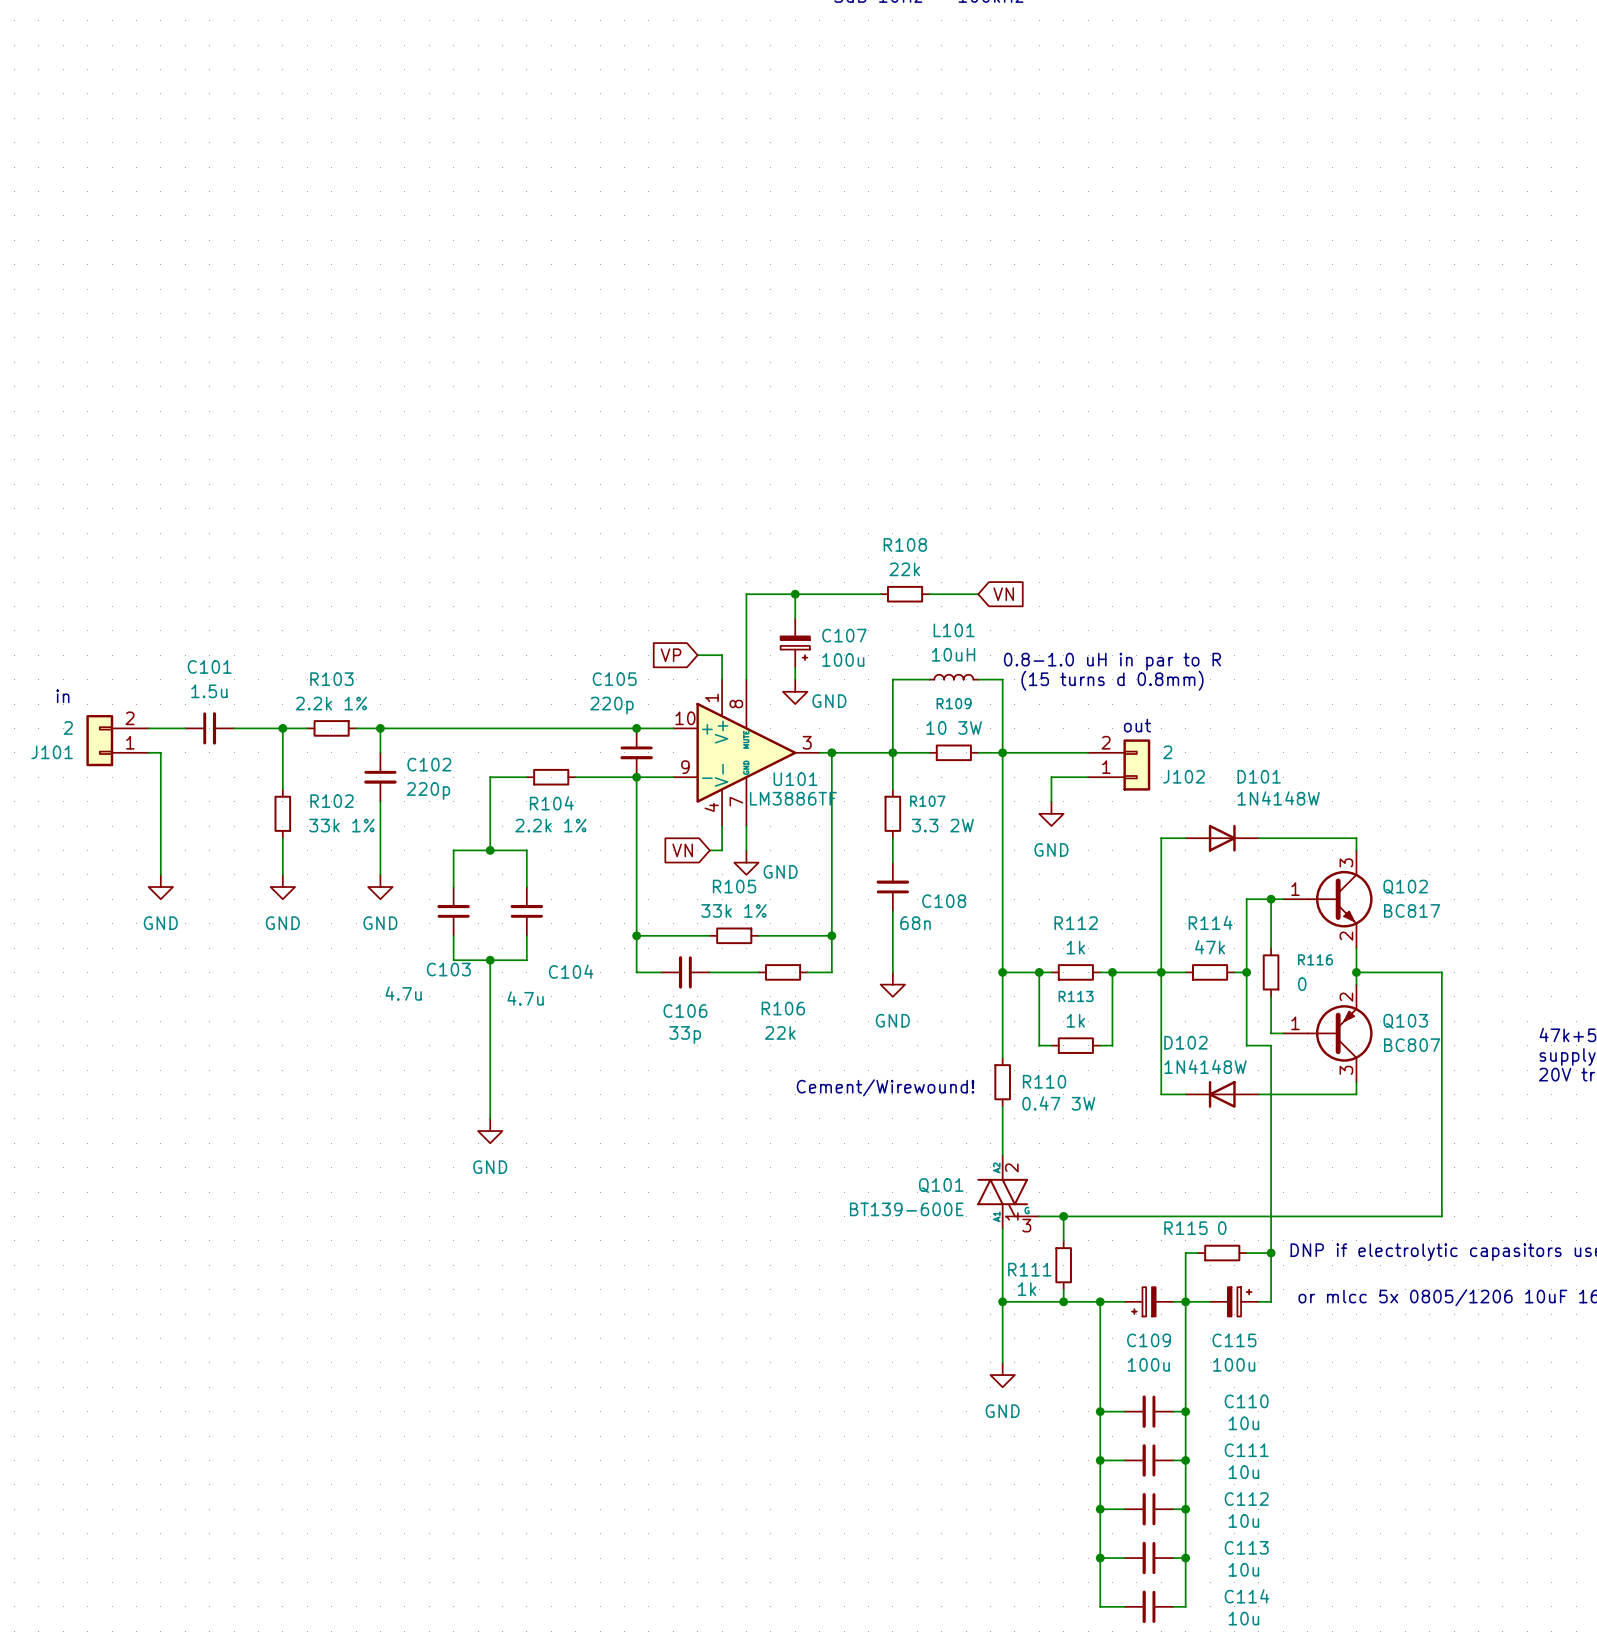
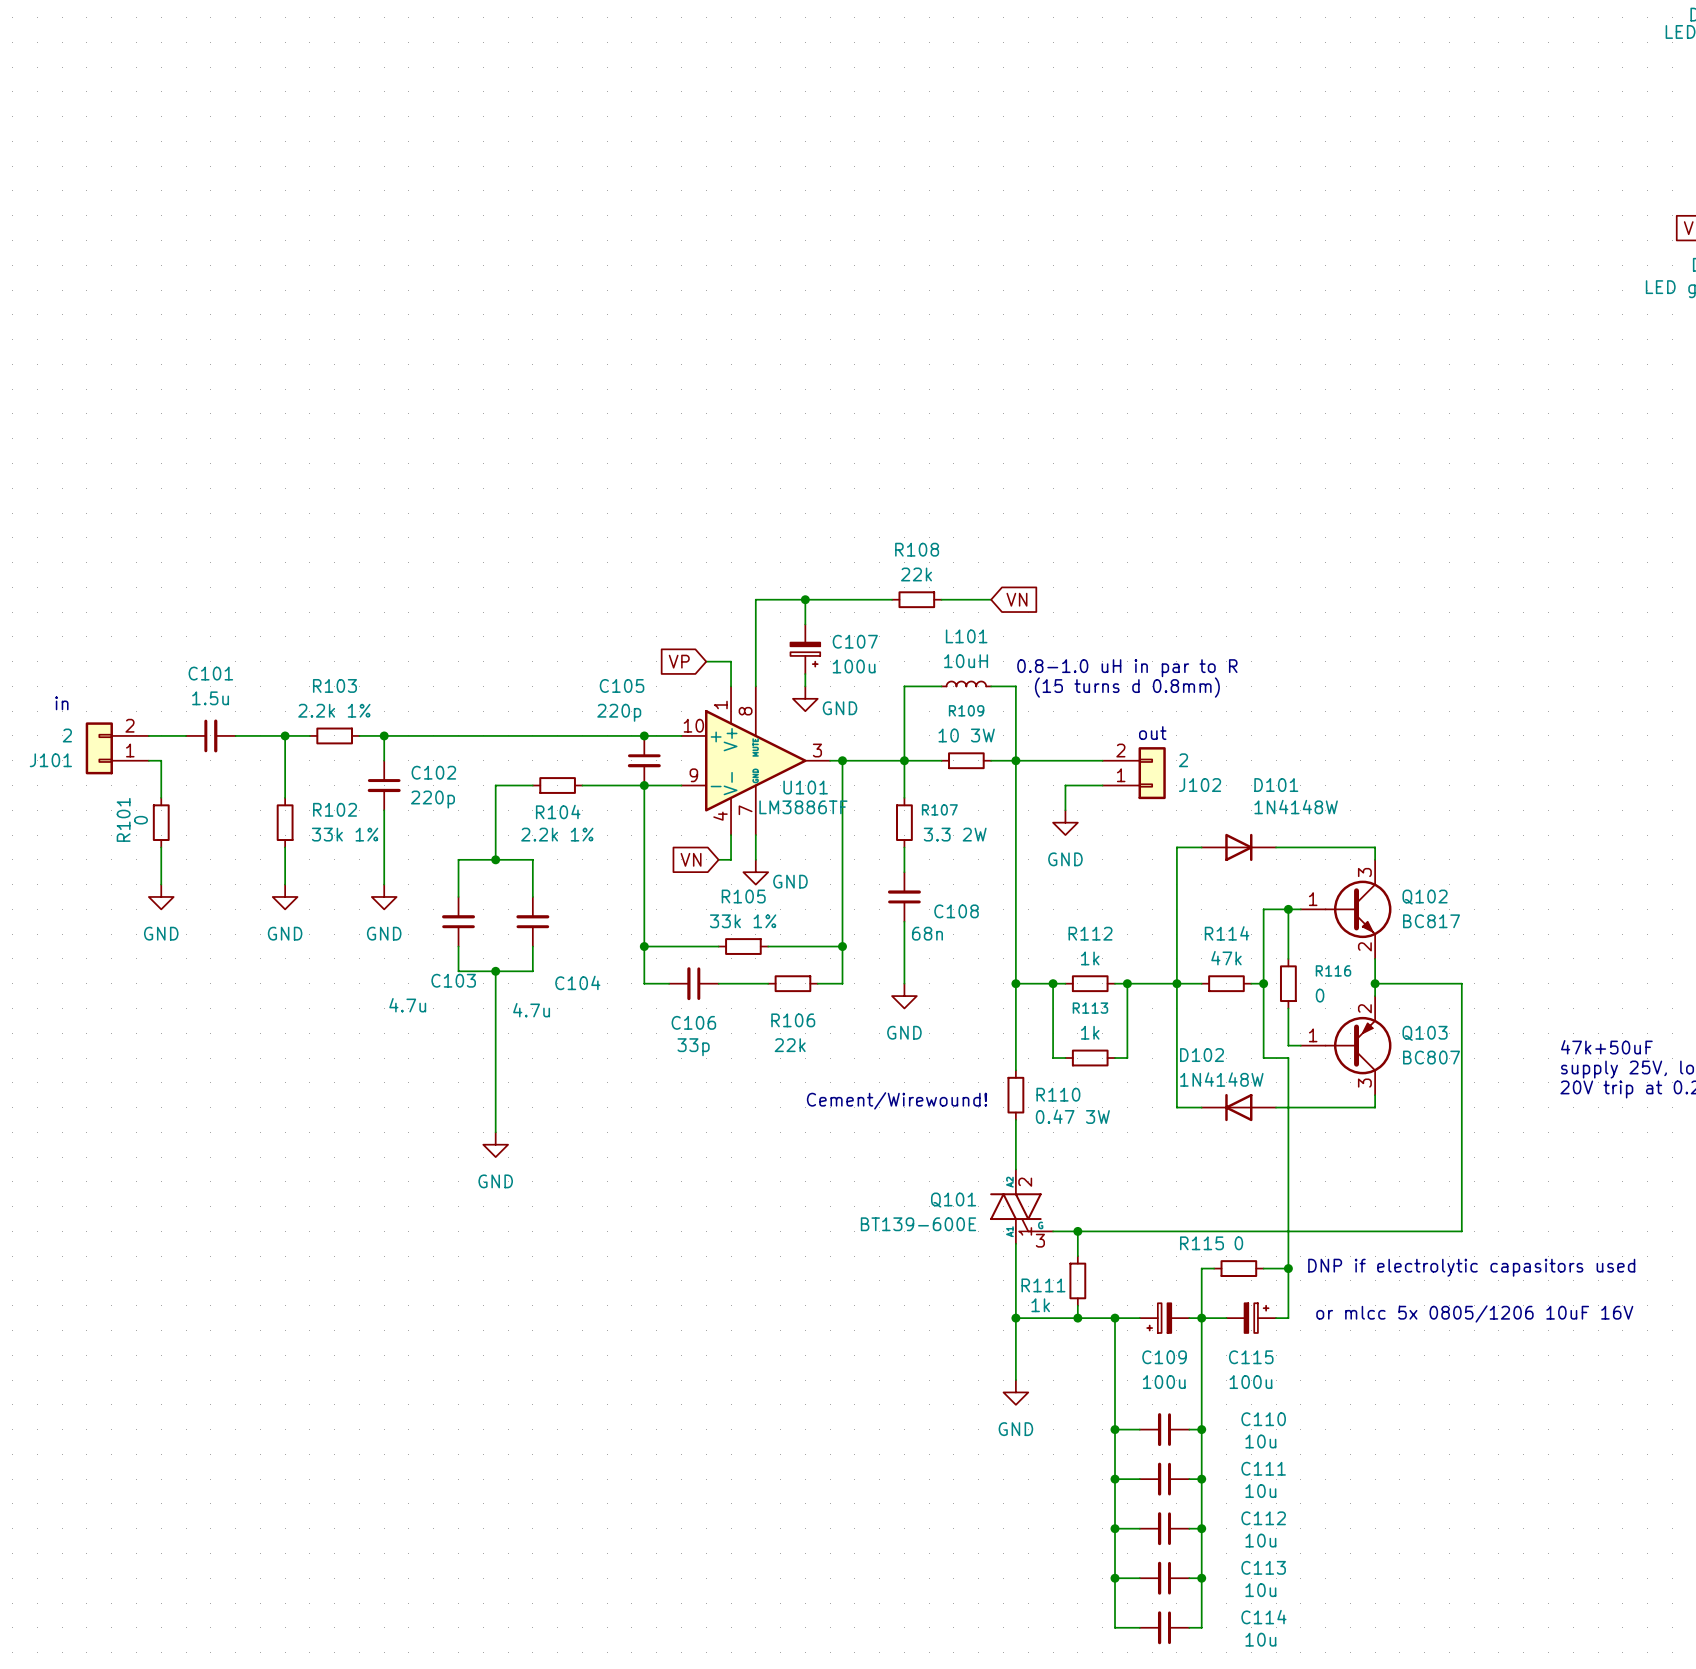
wire: (160, 789) (160, 838) -> none
R101: none -> 0 (161, 822)

